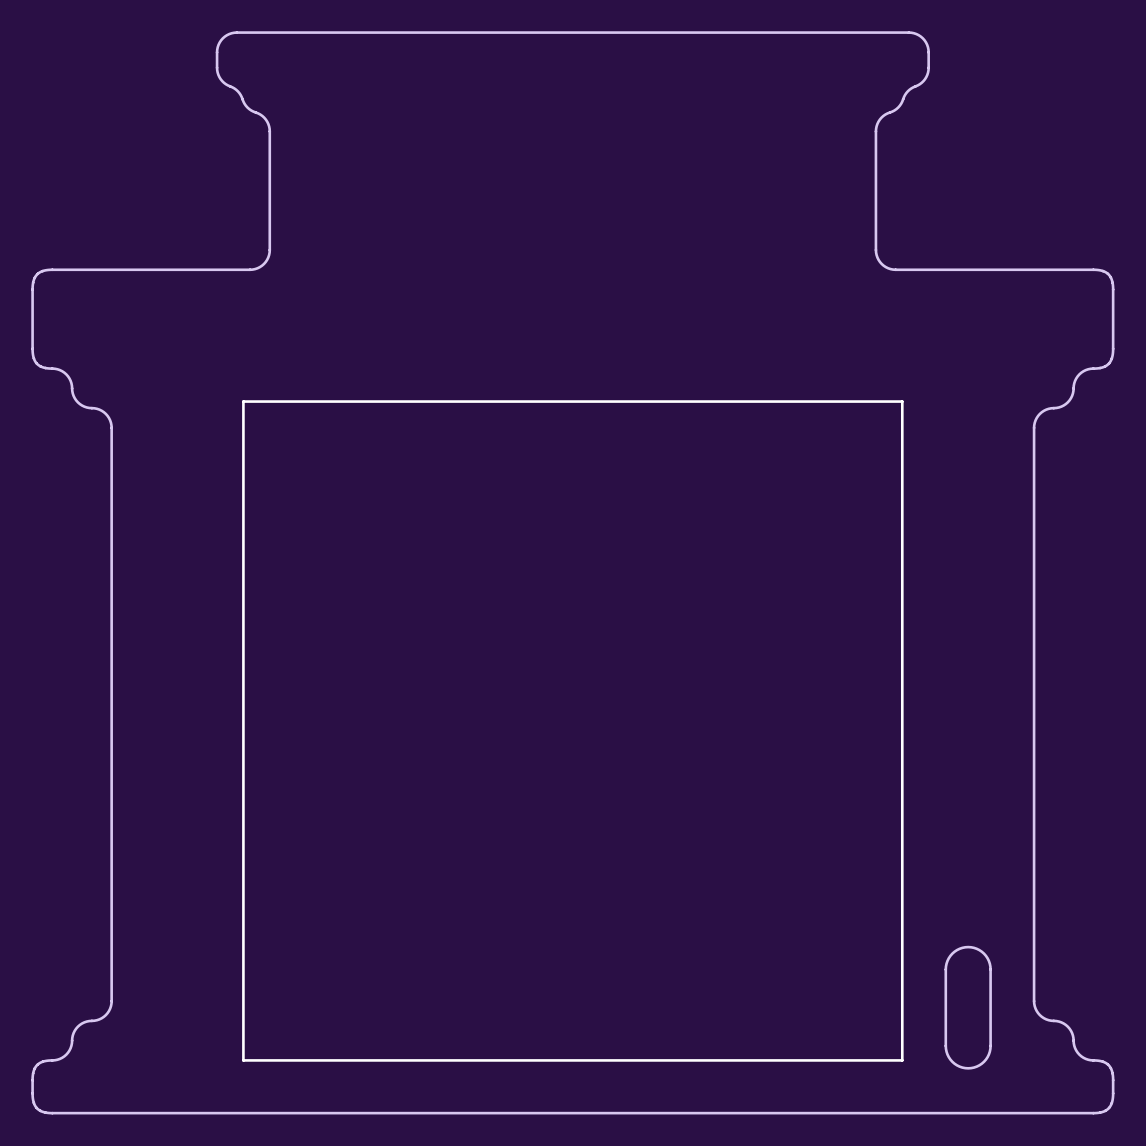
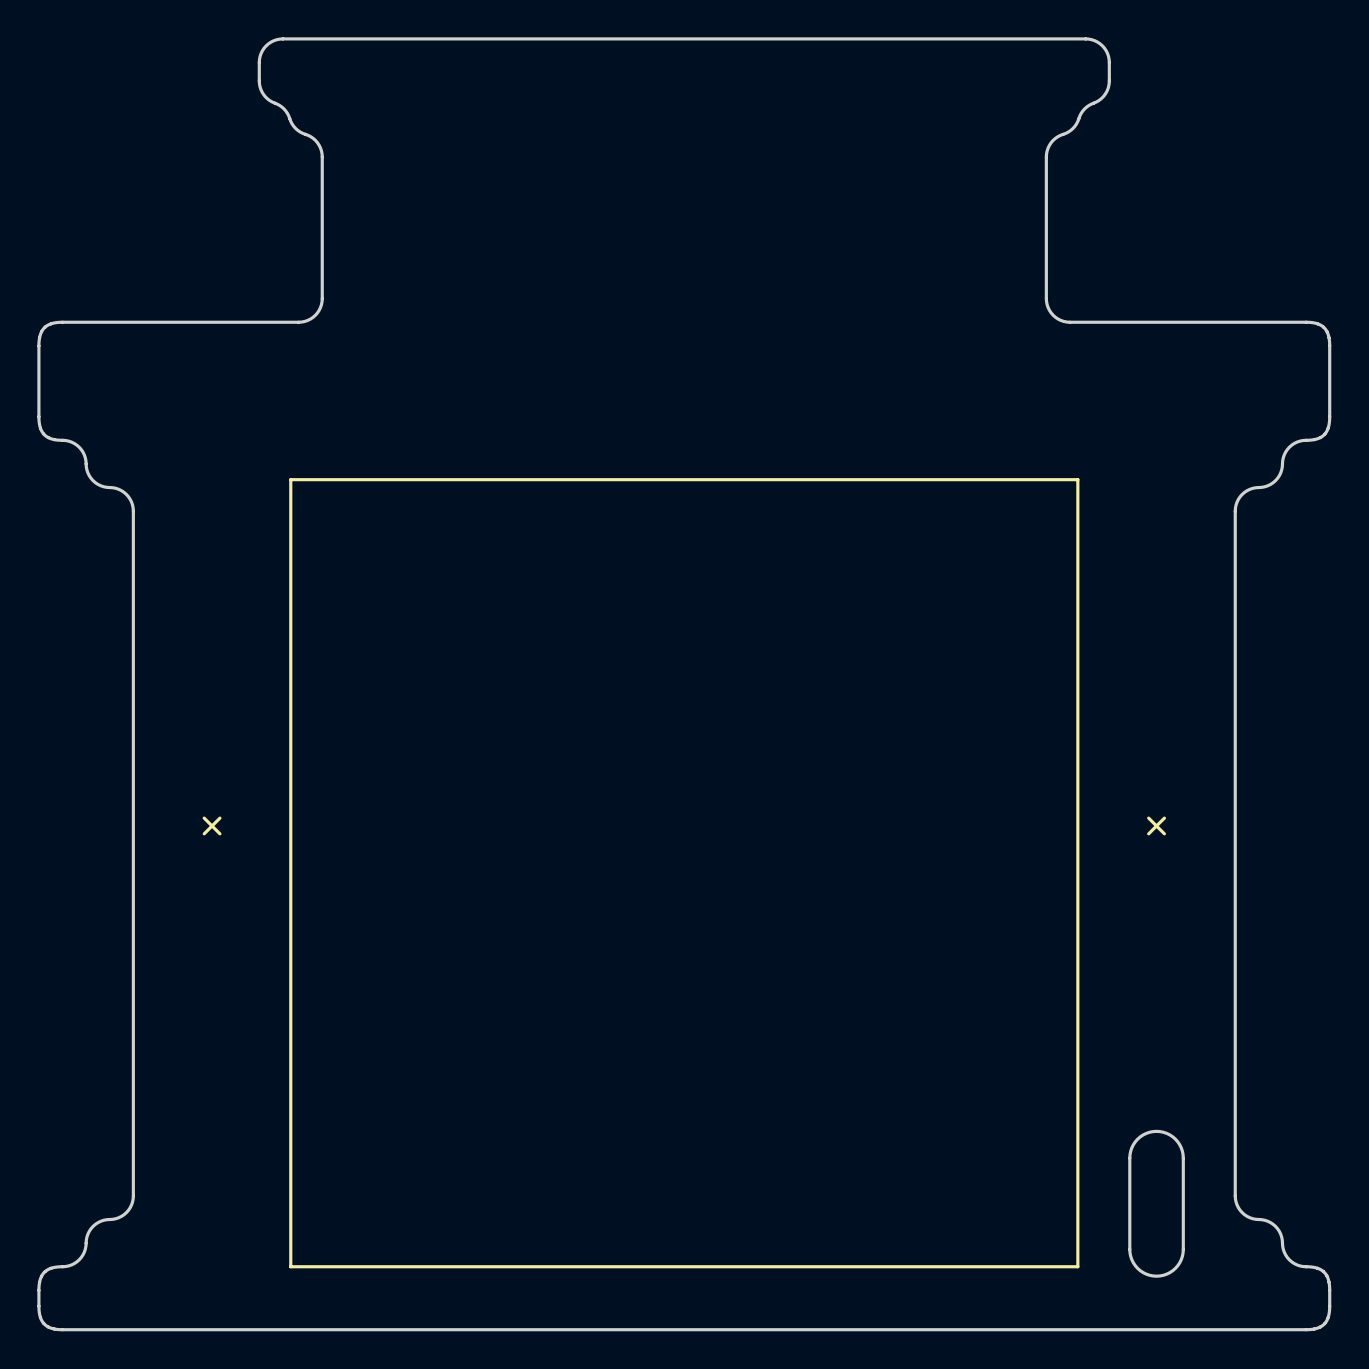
line: none -> (204, 818) (219, 833)
line: none -> (219, 818) (204, 833)
line: none -> (1148, 818) (1164, 833)
line: none -> (1164, 818) (1148, 833)

